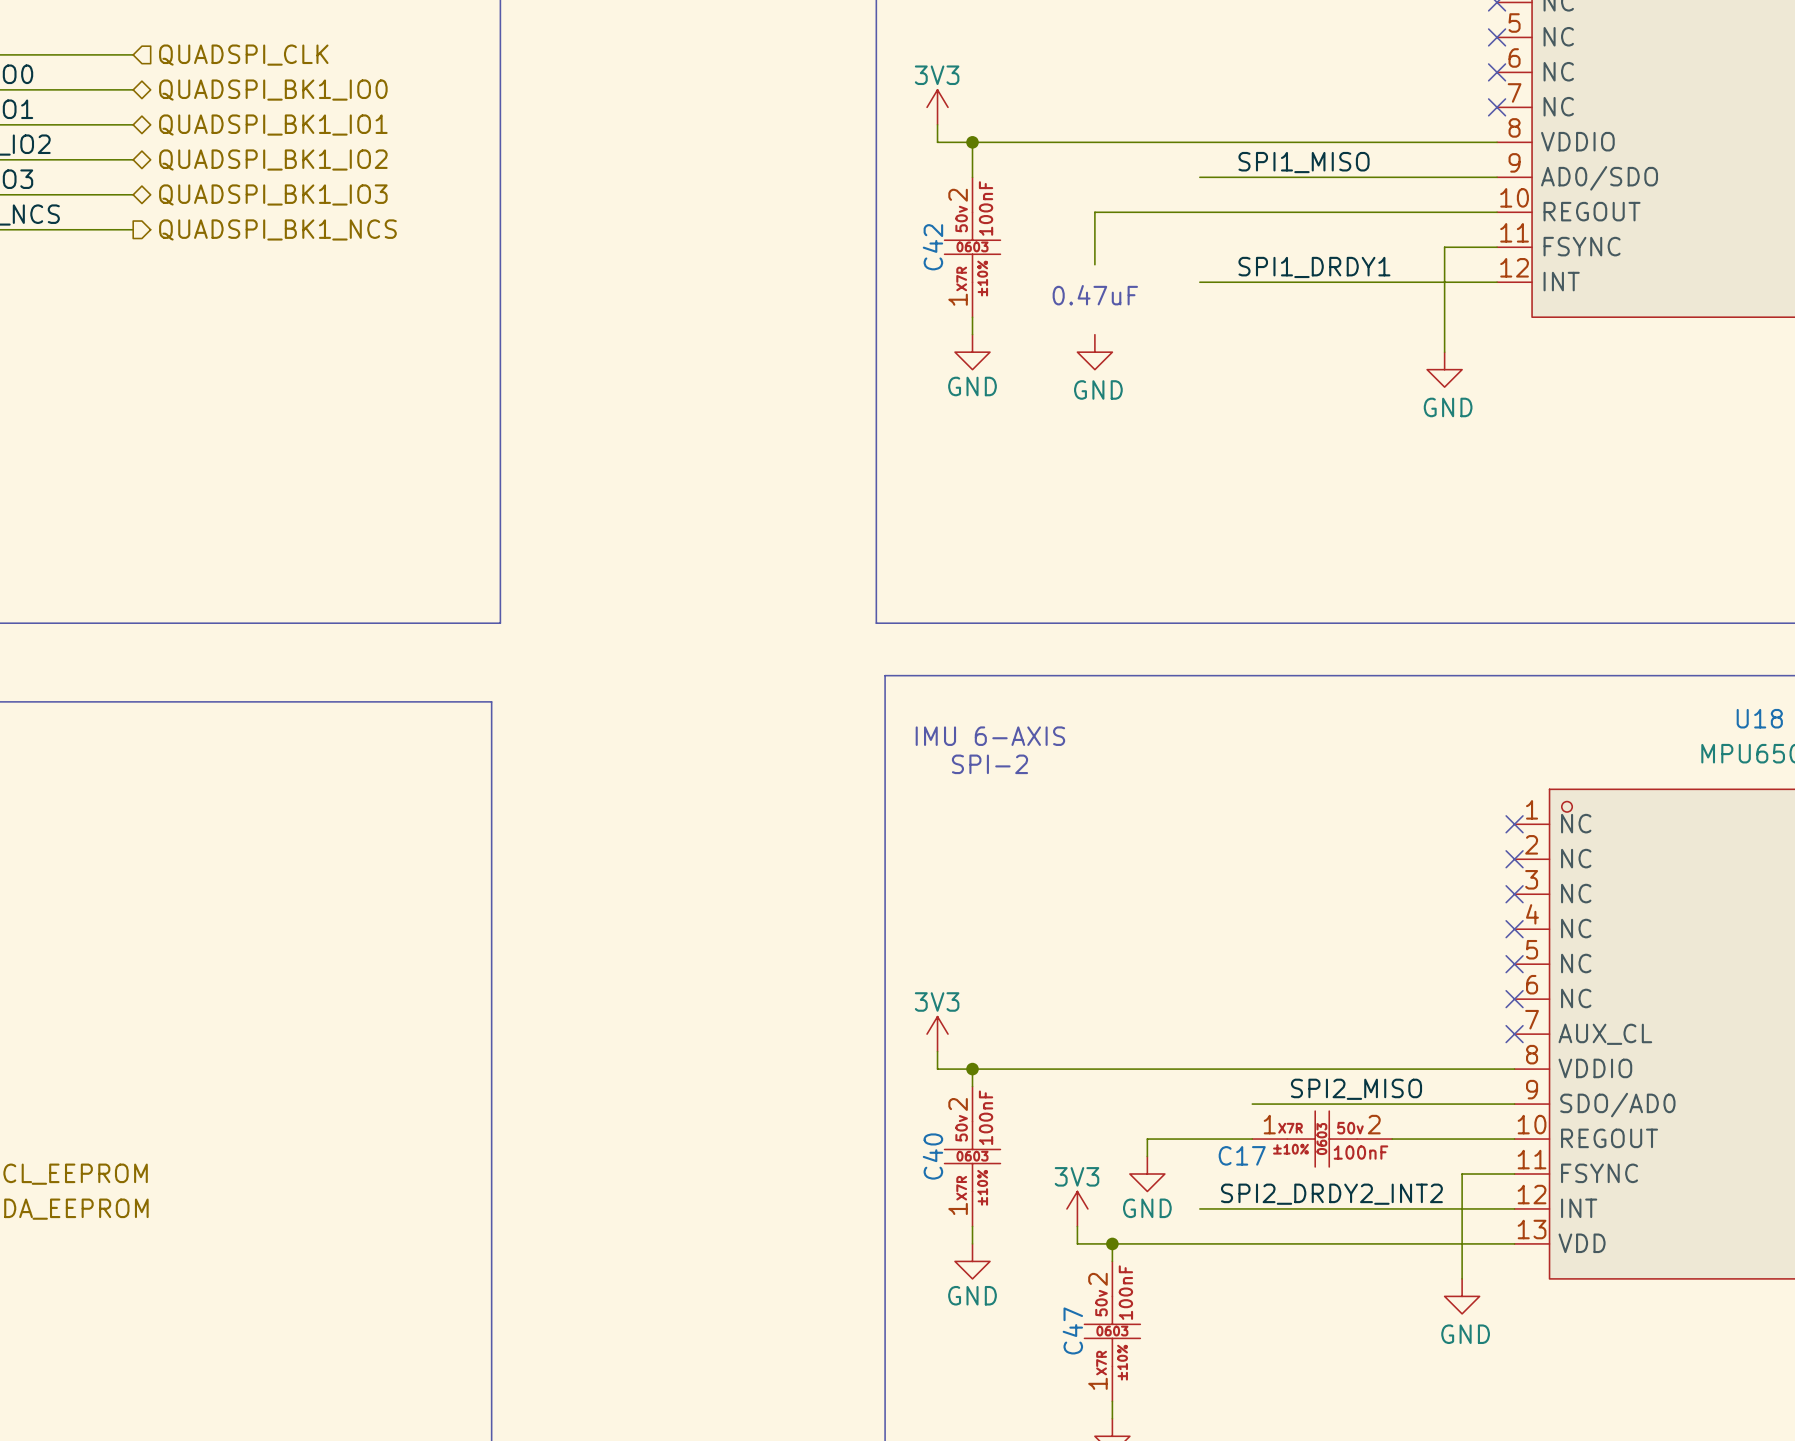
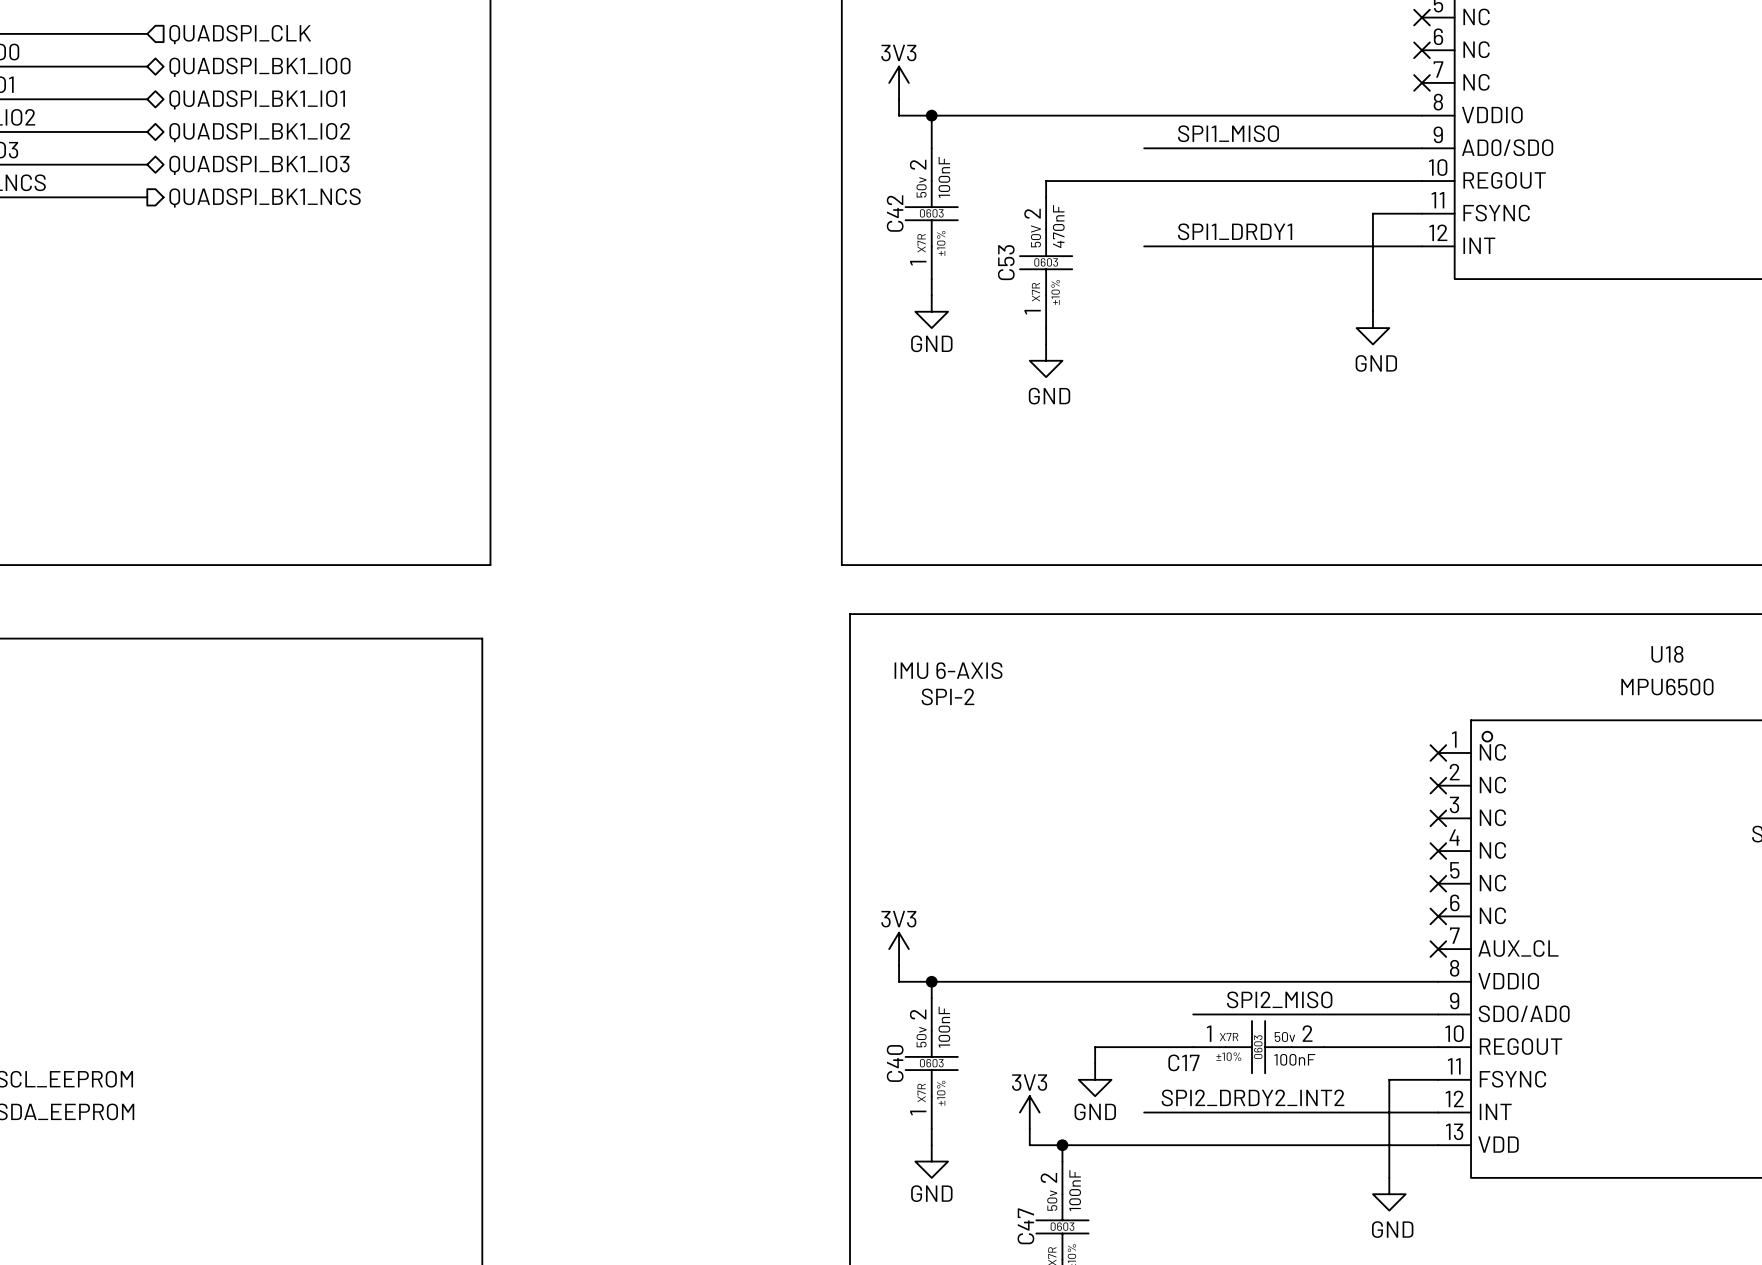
text: 0.47uF (1095, 295) -> none
C53: none -> (1046, 262)
power symbol position: GND (1094, 352) -> GND (1046, 360)
wire: none -> (1046, 328) (1046, 344)

